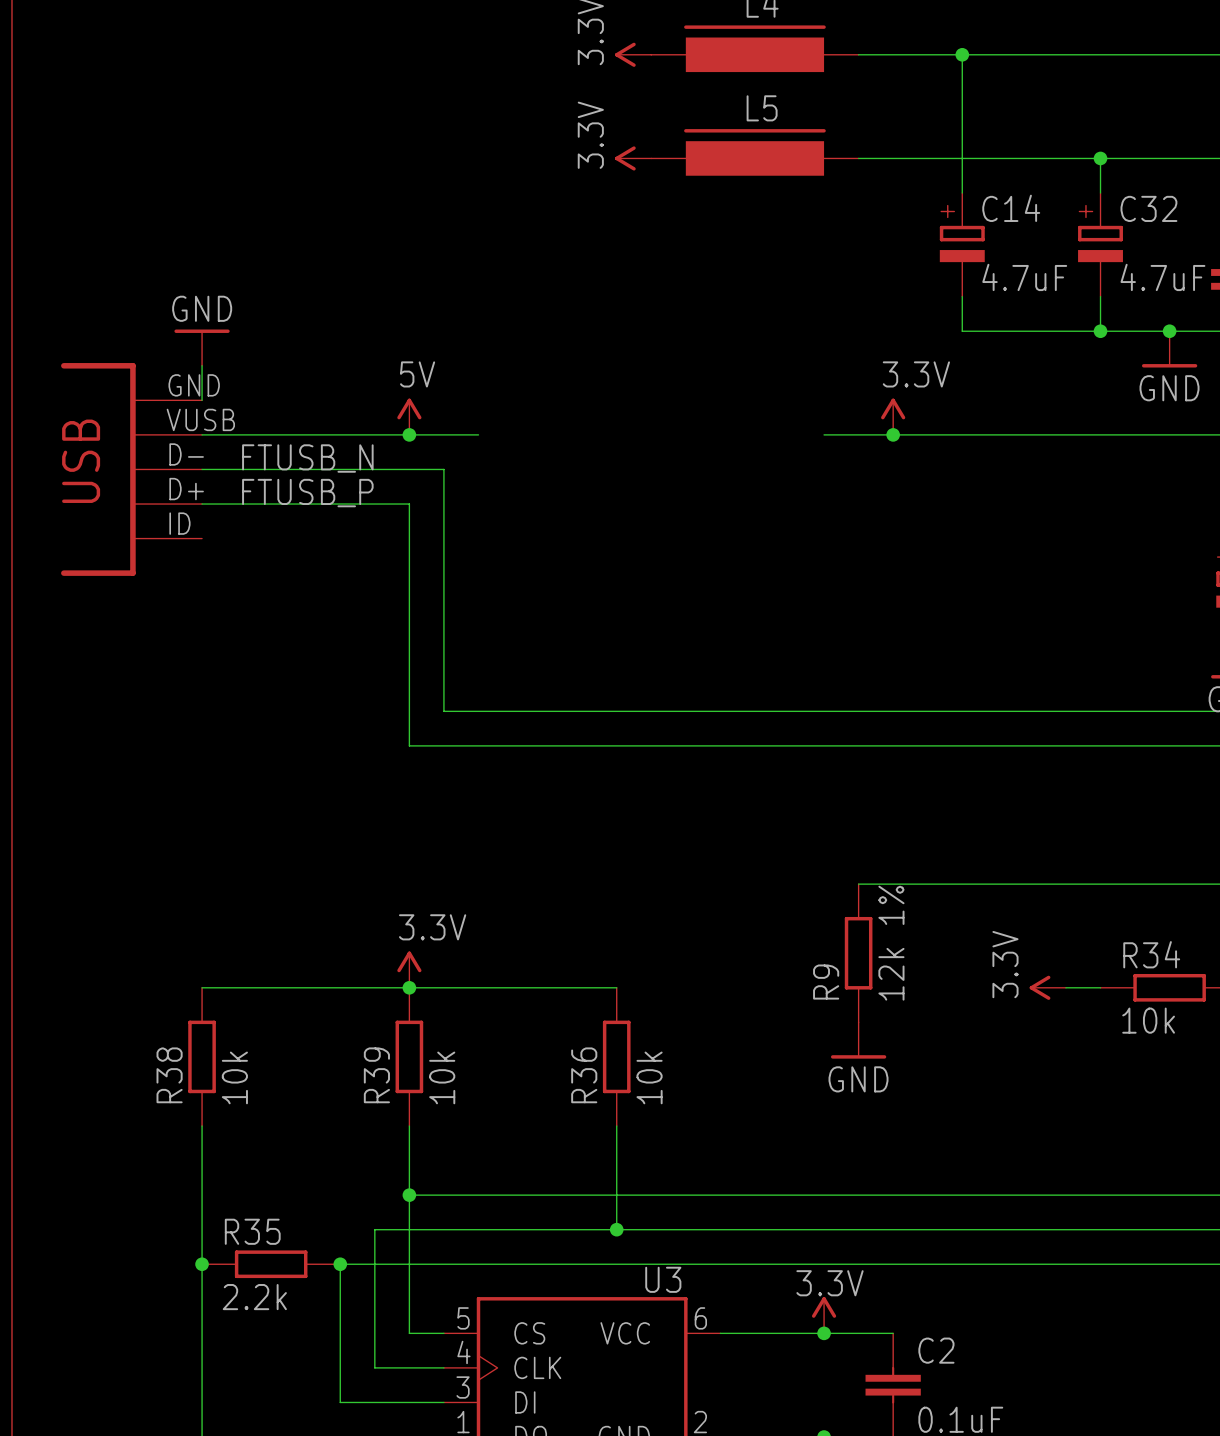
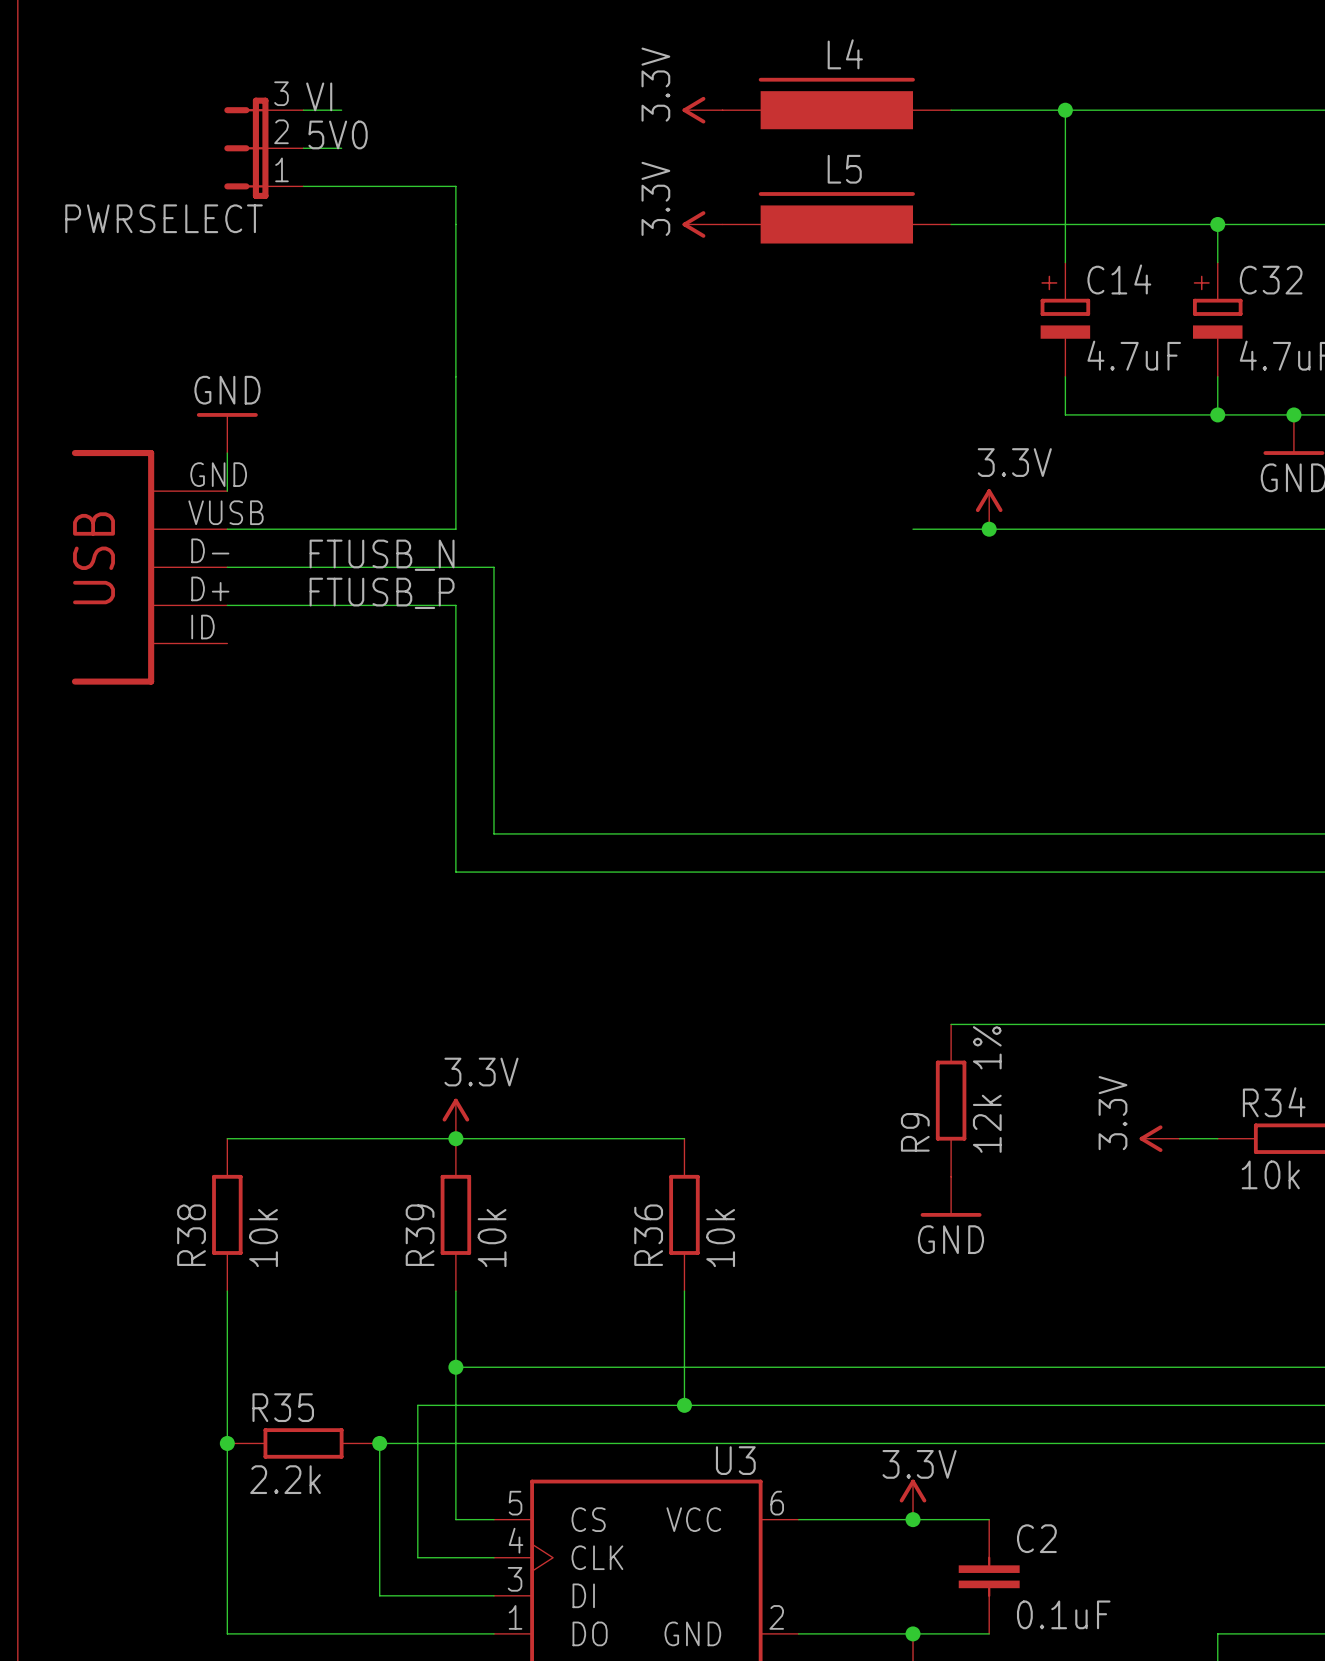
label: none -> VI (319, 96)
wire: none -> (303, 110) (341, 110)
label: none -> 5V0 (338, 134)
PWRSELECT: none -> (263, 148)
wire: none -> (303, 148) (341, 148)
power symbol: 5V (409, 416) -> none
wire: (409, 434) (478, 434) -> (455, 529) (455, 186) (303, 186)
junction: (409, 434) -> none
label position: FTUSB_N (307, 458) -> FTUSB_N (382, 555)
label position: FTUSB_P (307, 493) -> FTUSB_P (382, 593)

